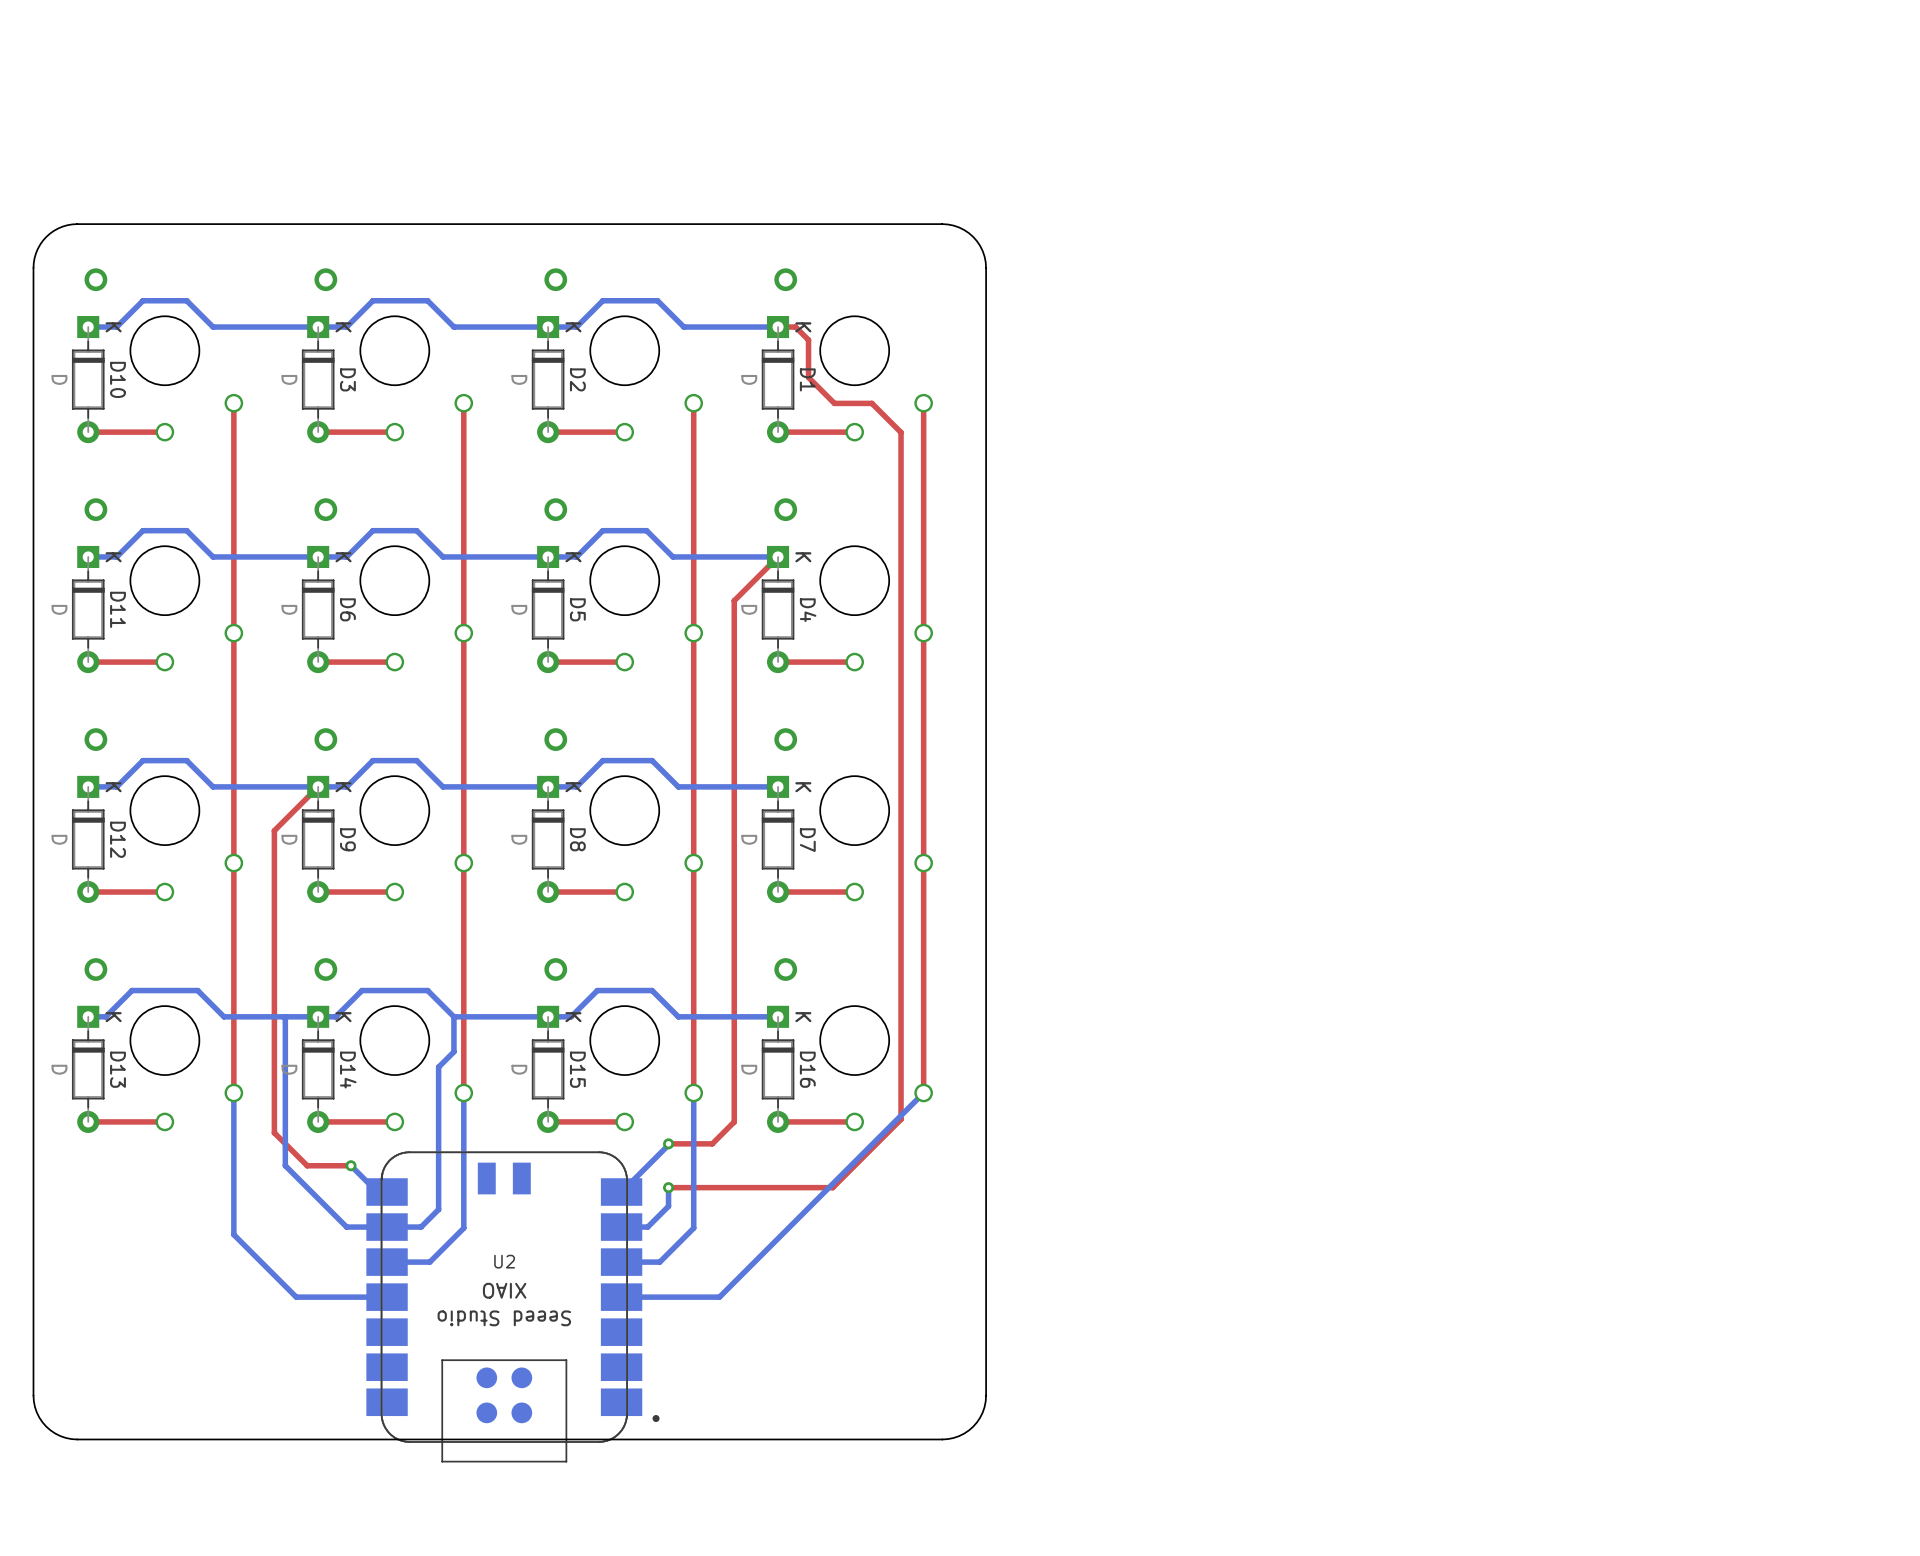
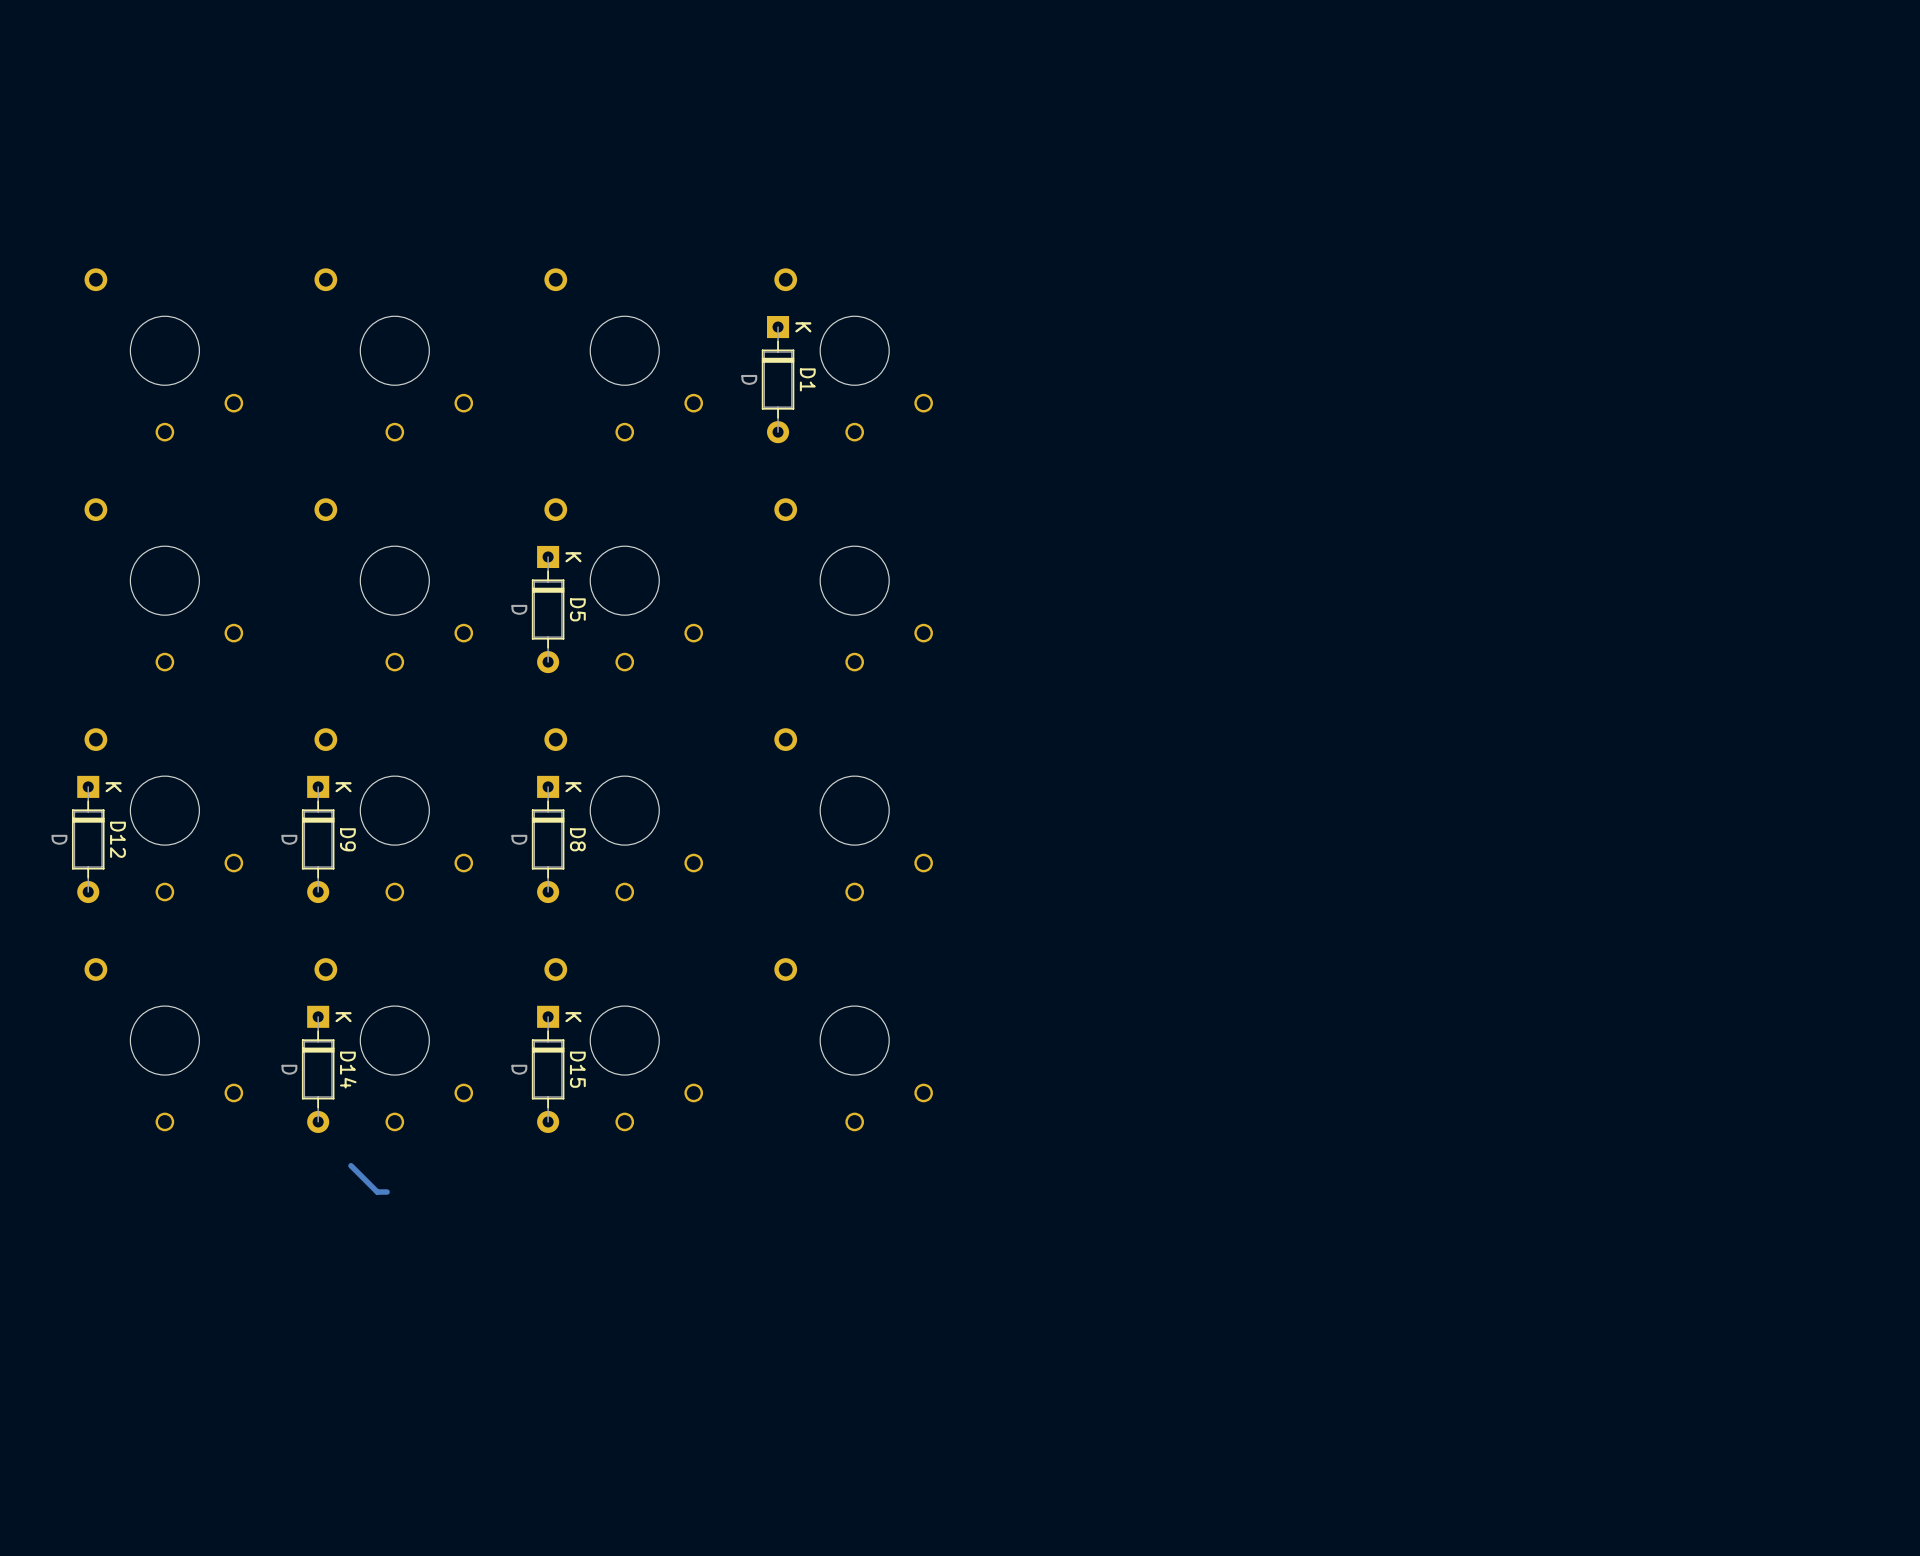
board edge: (942, 224) (77, 224) (58, 228) (43, 240) (35, 253) (33, 267) (33, 1395) (36, 1412) (50, 1430) (60, 1436) (77, 1439) (942, 1439) (959, 1436) (977, 1422) (984, 1407) (986, 1395) (986, 267) (982, 251) (973, 236) (959, 227) (942, 224) -> none
top track: (778, 327) (795, 327) (808, 339) (808, 377) (834, 403) (871, 403) (901, 432) (901, 1119) (832, 1187) (668, 1187) -> none
bottom track: (778, 327) (683, 327) (657, 300) (602, 300) (576, 327) (453, 327) (427, 300) (372, 300) (346, 327) (213, 327) (186, 300) (142, 300) (116, 327) (88, 327) -> none
D10: D (88, 379) -> none
D3: D (318, 379) -> none
D2: D (548, 379) -> none
top track: (233, 403) (233, 1092) -> none
top track: (463, 403) (463, 1092) -> none
top track: (693, 403) (693, 1092) -> none
top track: (923, 403) (923, 1092) -> none
top track: (164, 432) (88, 432) -> none
top track: (394, 432) (318, 432) -> none
top track: (624, 432) (548, 432) -> none
top track: (854, 432) (778, 432) -> none
top track: (778, 556) (734, 600) (734, 1121) (712, 1143) (668, 1143) -> none
bottom track: (778, 556) (672, 556) (646, 530) (602, 530) (576, 556) (442, 556) (416, 530) (372, 530) (346, 556) (213, 556) (186, 530) (142, 530) (116, 556) (88, 556) -> none
D11: D (88, 609) -> none
D6: D (318, 609) -> none
D4: D (778, 609) -> none
top track: (164, 662) (88, 662) -> none
top track: (394, 662) (318, 662) -> none
top track: (624, 662) (548, 662) -> none
top track: (854, 662) (778, 662) -> none
top track: (318, 786) (274, 830) (274, 1132) (307, 1165) (351, 1165) -> none
bottom track: (778, 786) (678, 786) (652, 760) (602, 760) (576, 786) (442, 786) (416, 760) (372, 760) (346, 786) (213, 786) (186, 760) (142, 760) (116, 786) (88, 786) -> none
D7: D (778, 839) -> none
top track: (164, 892) (88, 892) -> none
top track: (394, 892) (318, 892) -> none
top track: (624, 892) (548, 892) -> none
top track: (854, 892) (778, 892) -> none
bottom track: (453, 1016) (453, 1051) (438, 1067) (438, 1209) (421, 1227) (346, 1227) (285, 1165) (285, 1016) -> none
bottom track: (453, 1016) (427, 990) (361, 990) (335, 1016) (224, 1016) (197, 990) (132, 990) (105, 1016) (88, 1016) -> none
bottom track: (778, 1016) (678, 1016) (652, 990) (597, 990) (571, 1016) (453, 1016) -> none
D13: D (88, 1069) -> none
D16: D (778, 1069) -> none
bottom track: (233, 1092) (233, 1234) (296, 1297) (387, 1297) -> none
bottom track: (463, 1092) (463, 1228) (429, 1262) (387, 1262) -> none
bottom track: (693, 1092) (693, 1228) (659, 1262) (621, 1262) -> none
bottom track: (923, 1092) (719, 1297) (621, 1297) -> none
top track: (164, 1121) (88, 1121) -> none
top track: (394, 1121) (318, 1121) -> none
top track: (624, 1121) (548, 1121) -> none
top track: (854, 1121) (778, 1121) -> none
bottom track: (668, 1143) (621, 1192) -> none
via: (668, 1143) -> none
via: (351, 1165) -> none
bottom track: (668, 1187) (668, 1206) (647, 1227) (621, 1227) -> none
via: (668, 1187) -> none
U2: (512, 1306) -> none

